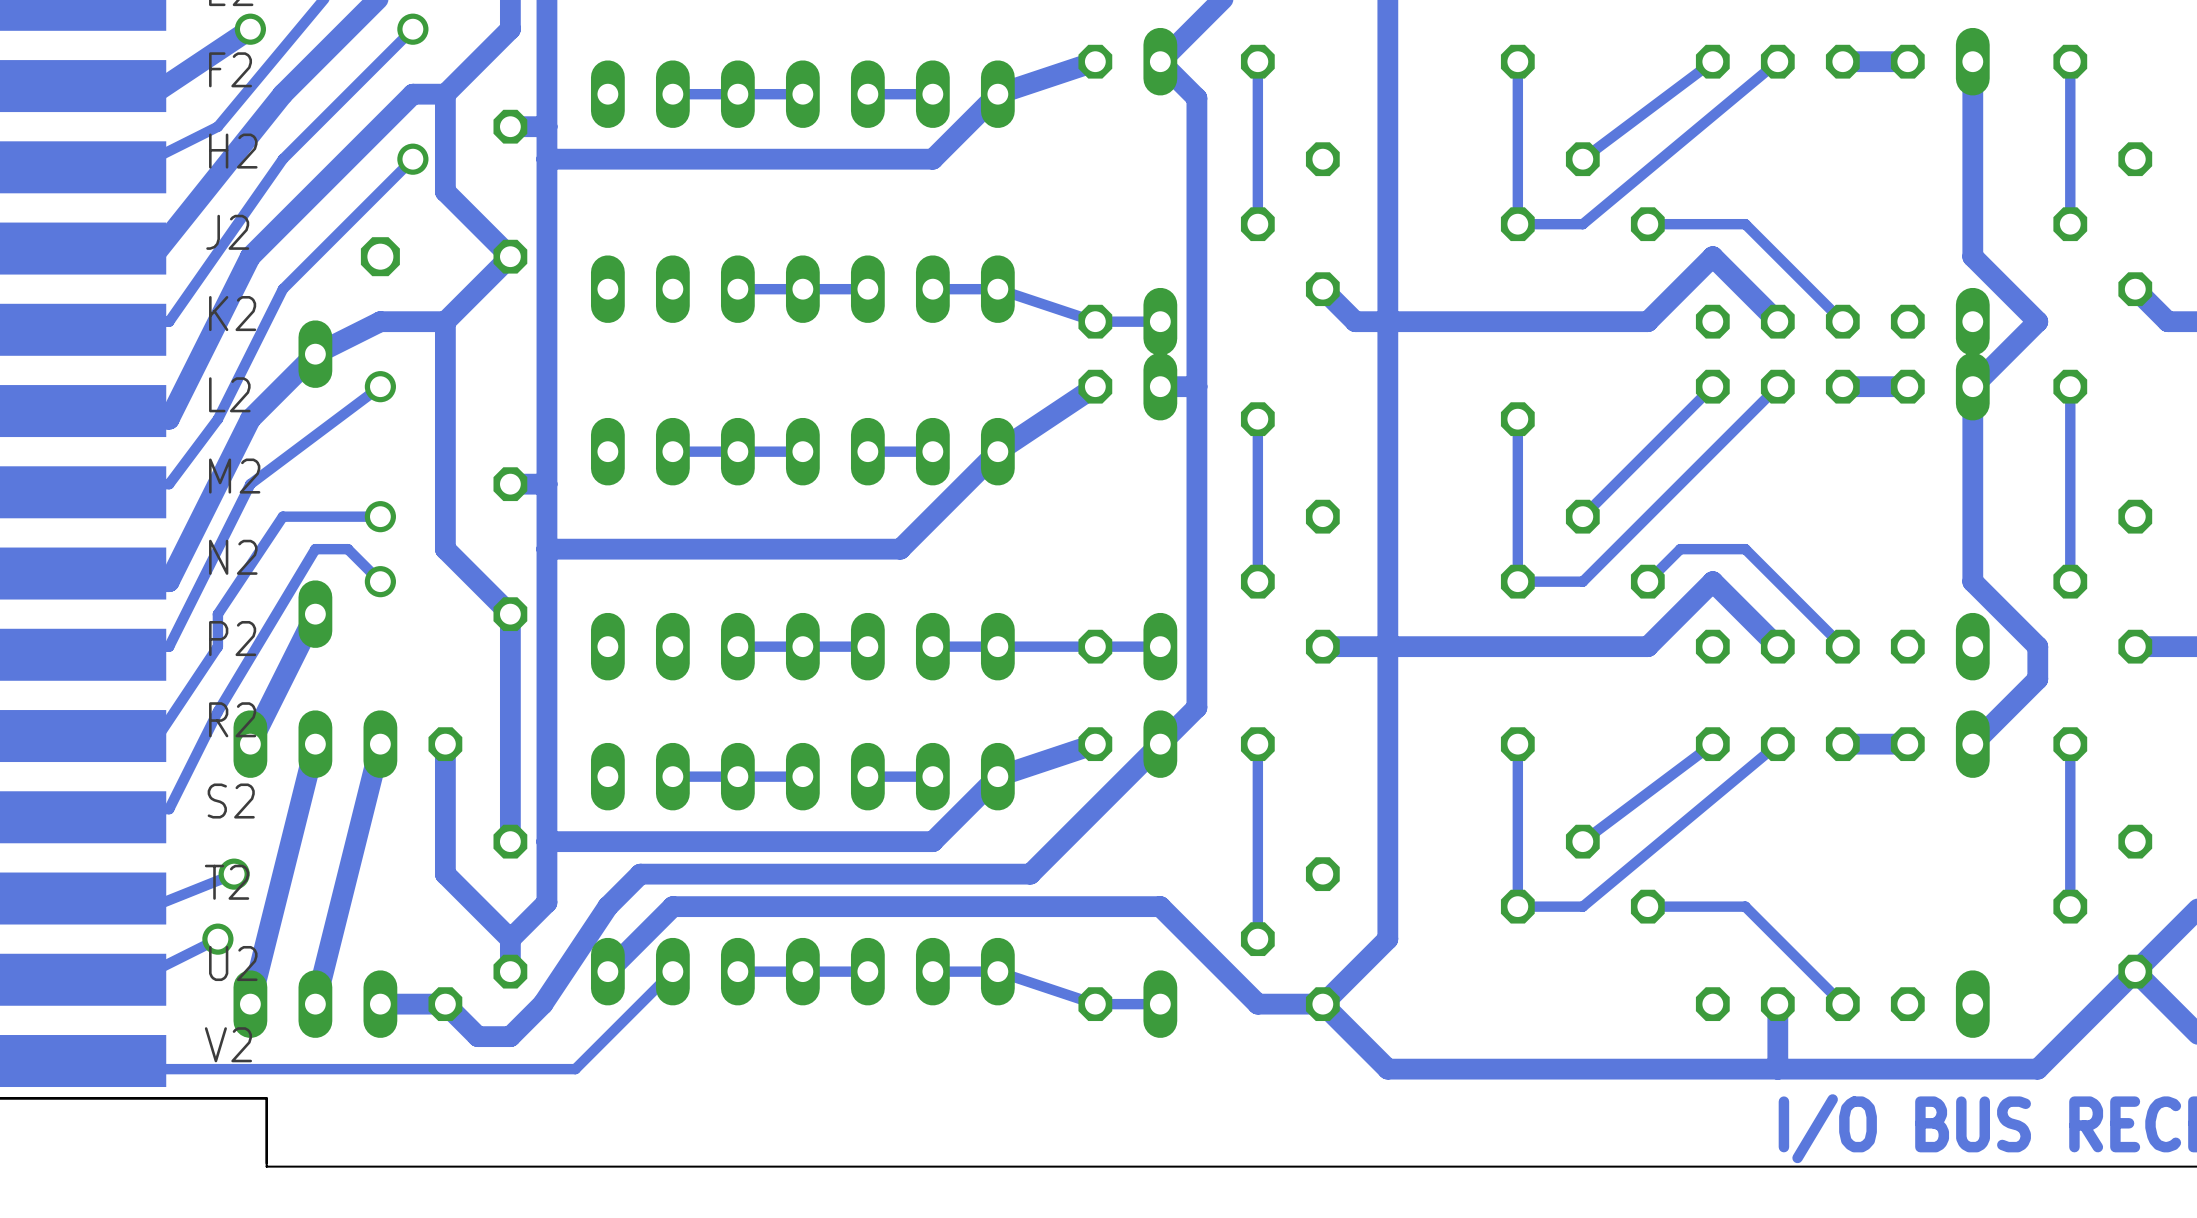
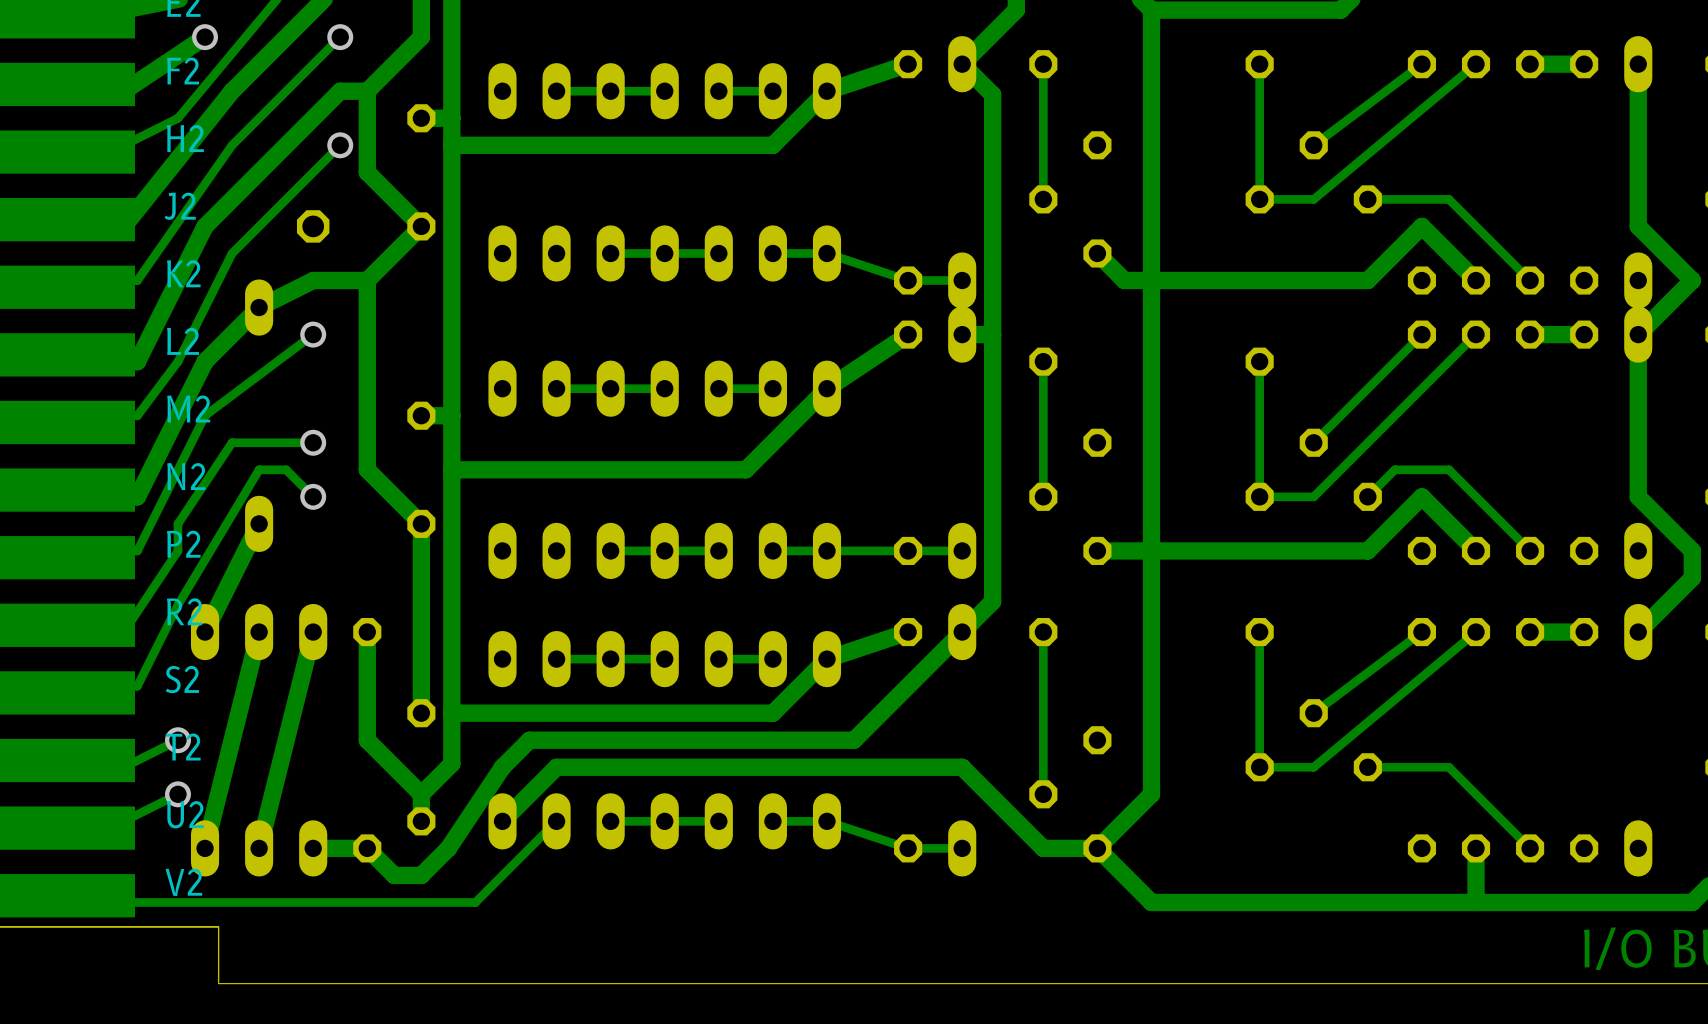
track: (234, 874) (152, 906) -> (177, 740) (123, 767)
via position: (234, 874) -> (177, 740)

